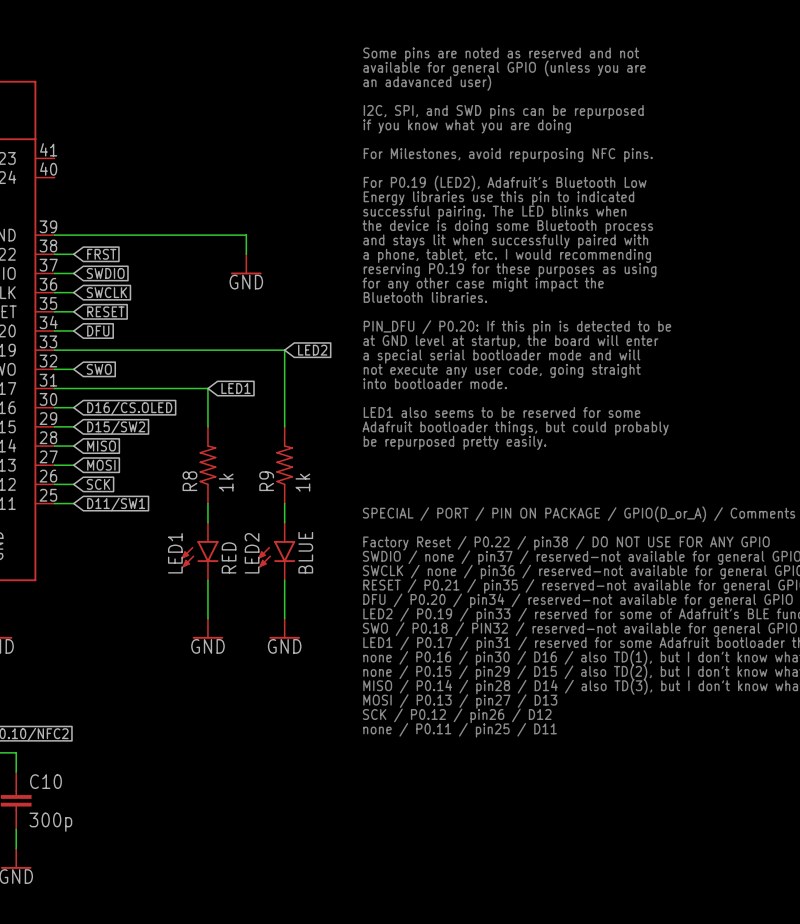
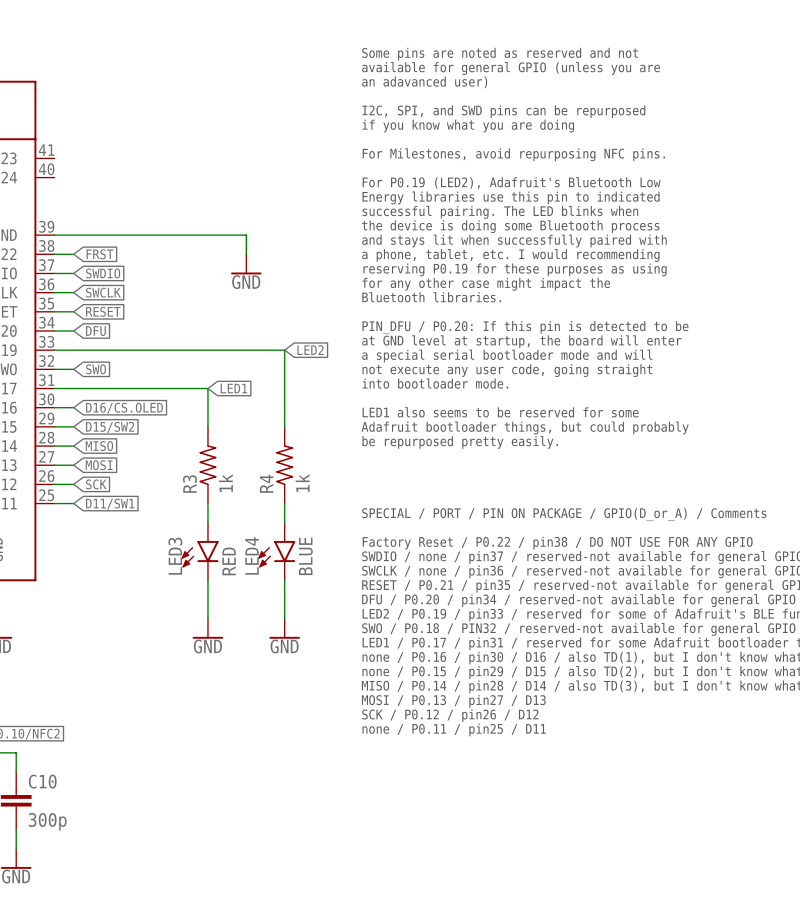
R8 name: R8 (189, 481) -> R3 (189, 484)
R9 name: R9 (266, 481) -> R4 (266, 483)
LED1 name: LED1 (175, 553) -> LED3 (175, 556)
LED2 name: LED2 (252, 553) -> LED4 (252, 556)

